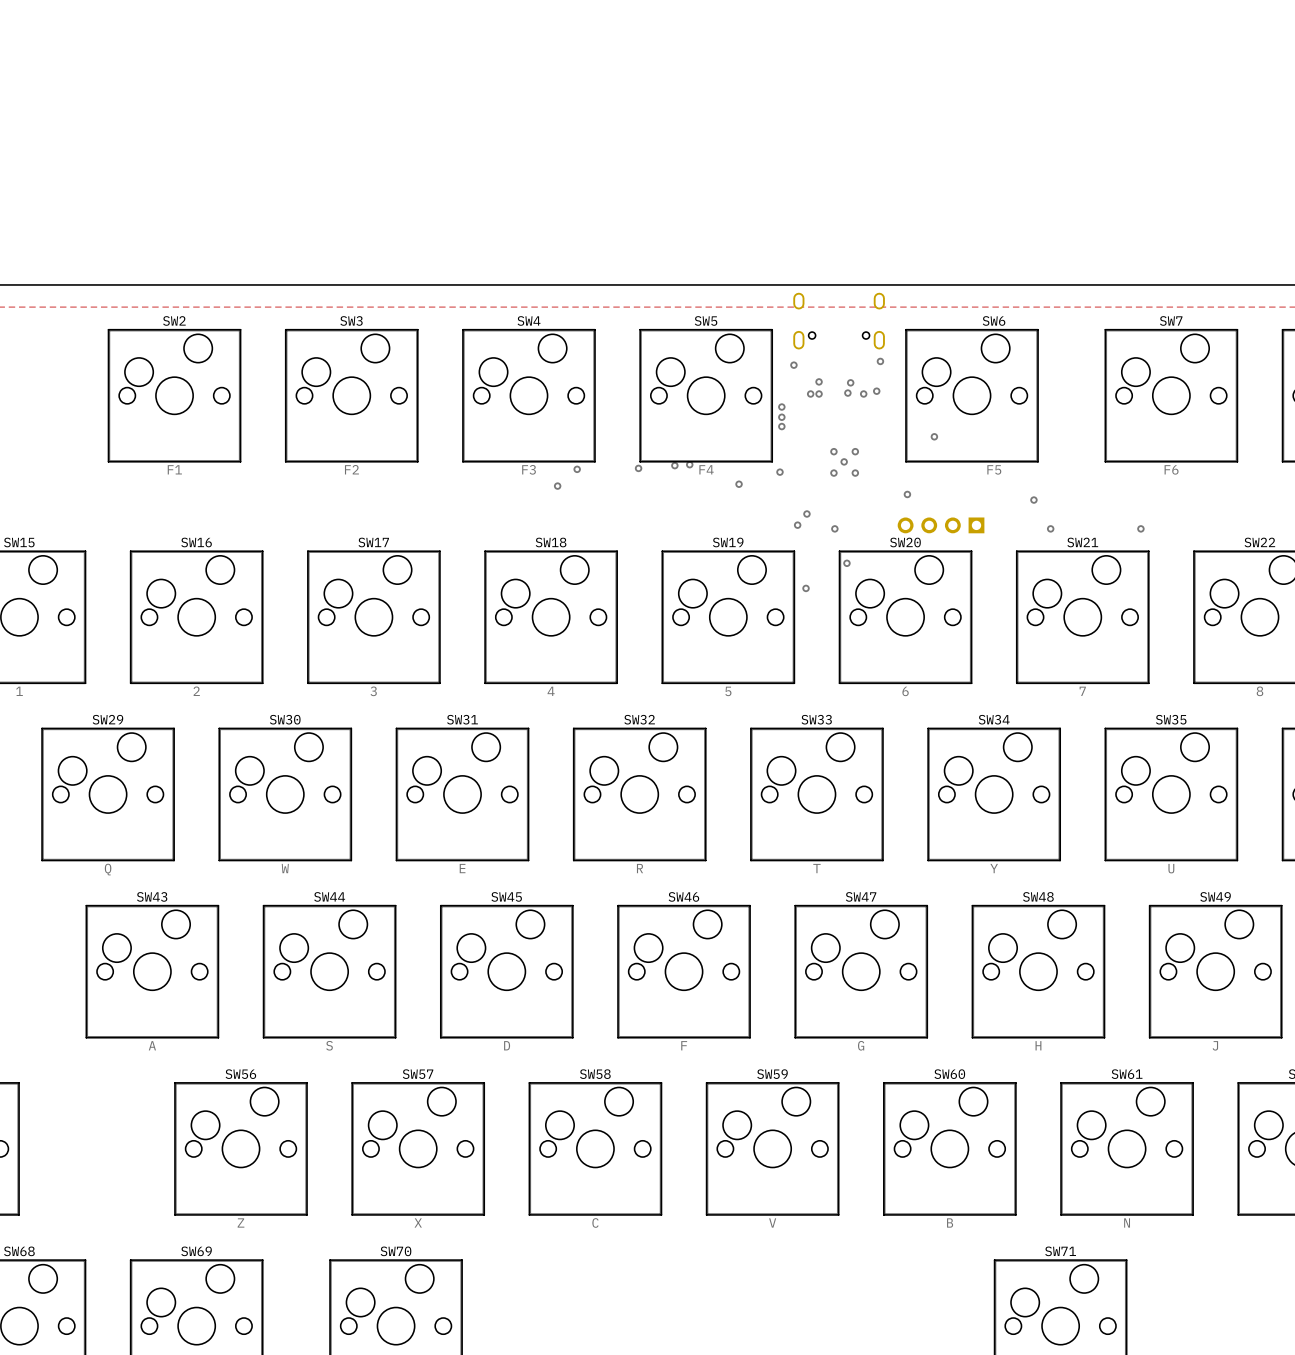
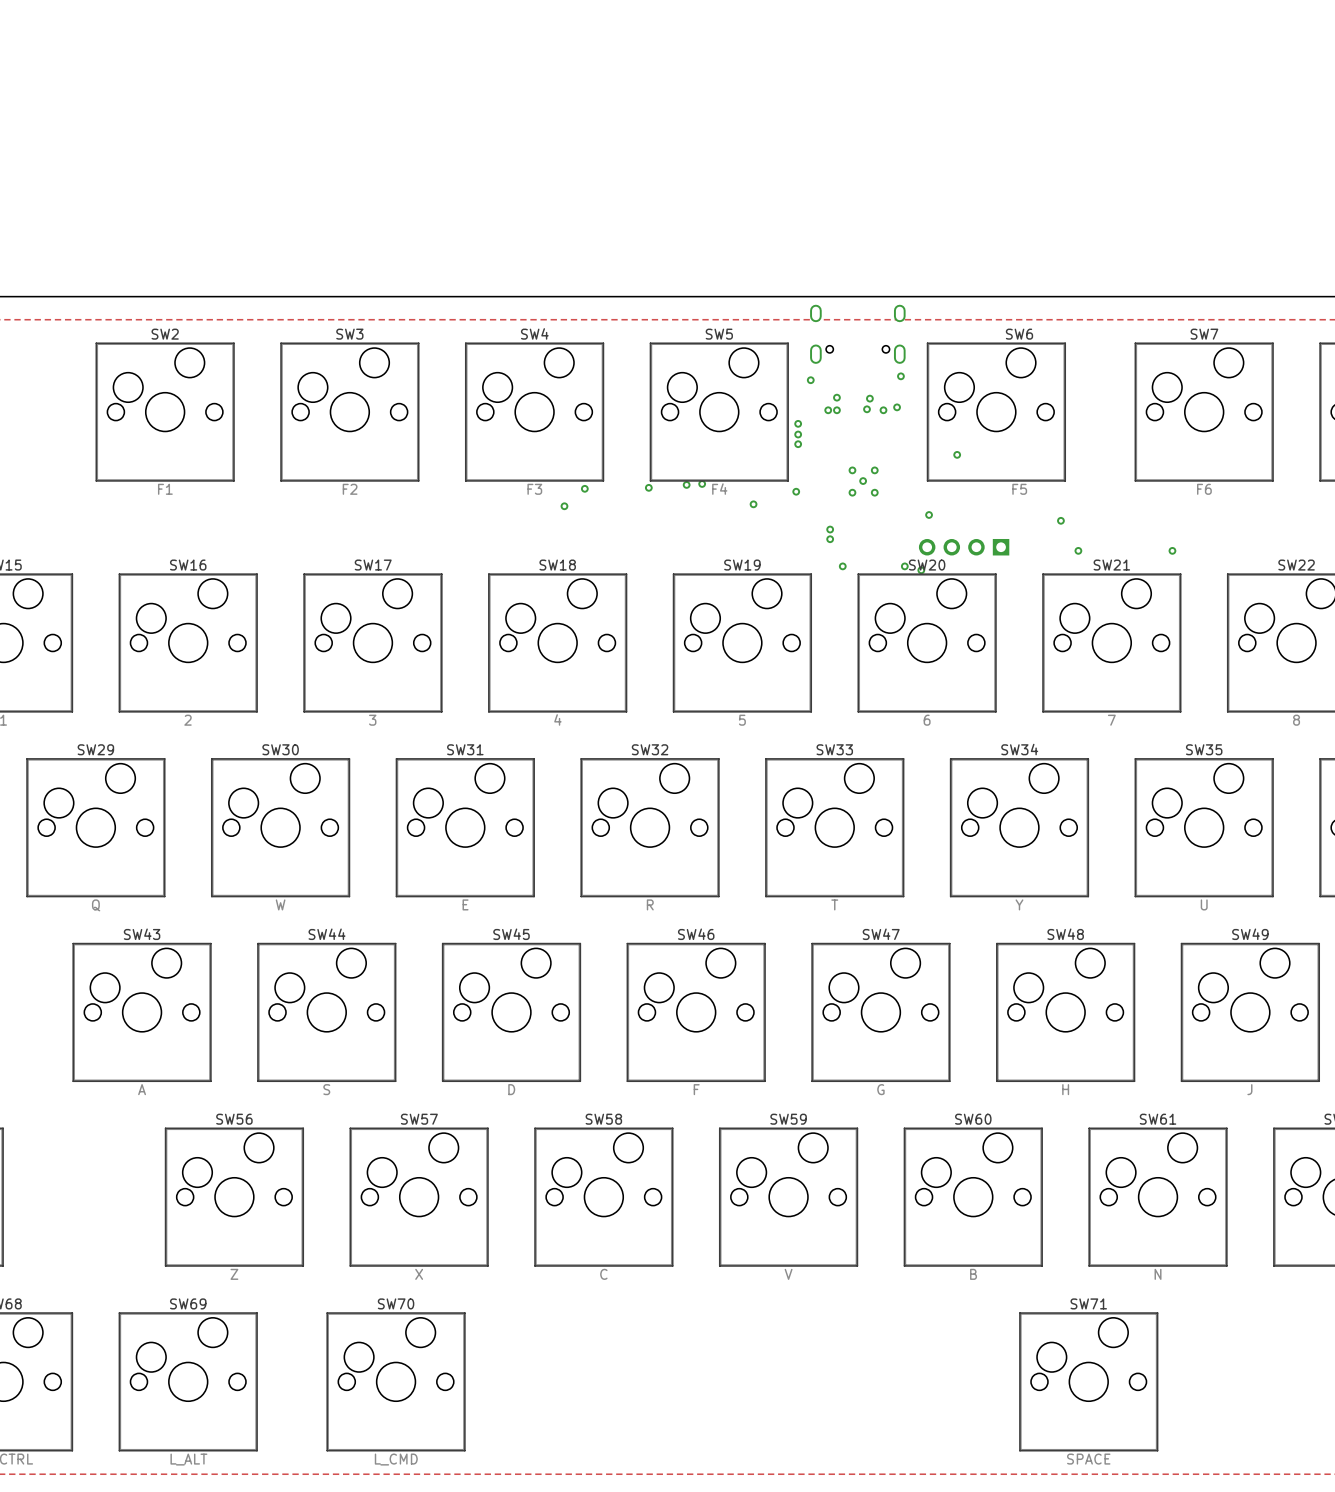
via: none -> (830, 529)
via: (806, 514) -> none
via: none -> (830, 539)
via: (797, 525) -> none
via: (834, 528) -> none
via: none -> (842, 566)
via: none -> (904, 566)
via: none -> (921, 570)
via: (846, 563) -> none
via: (806, 588) -> none

